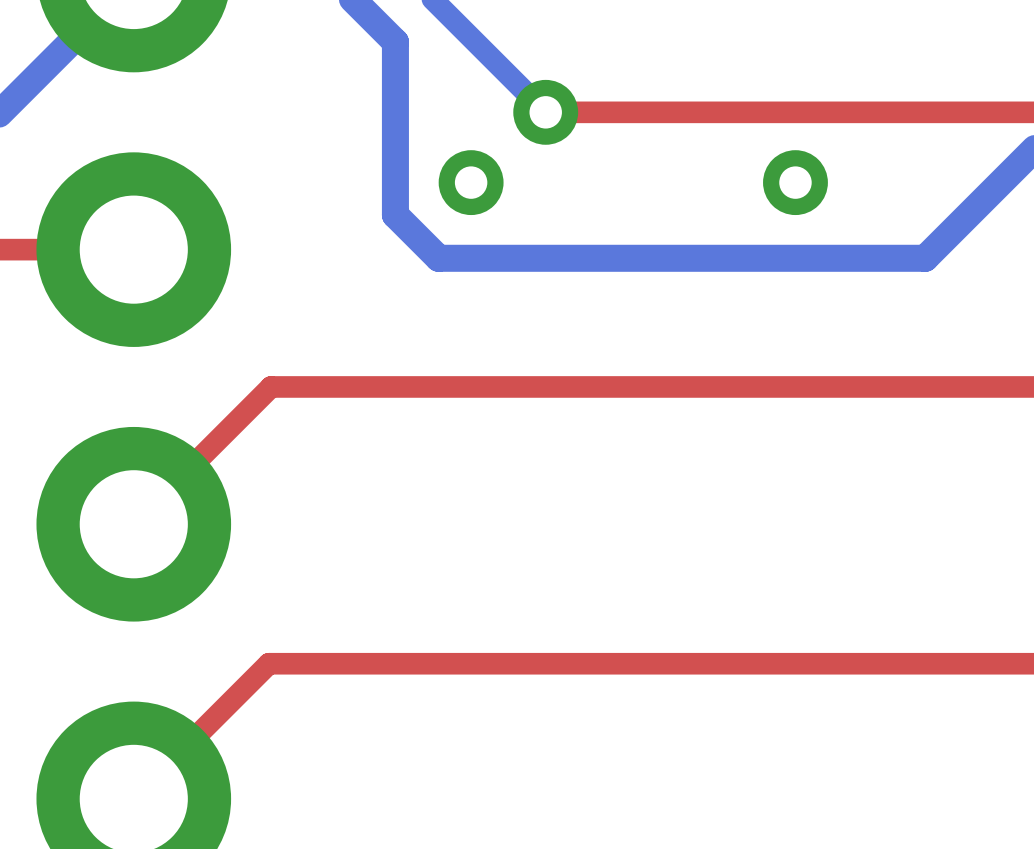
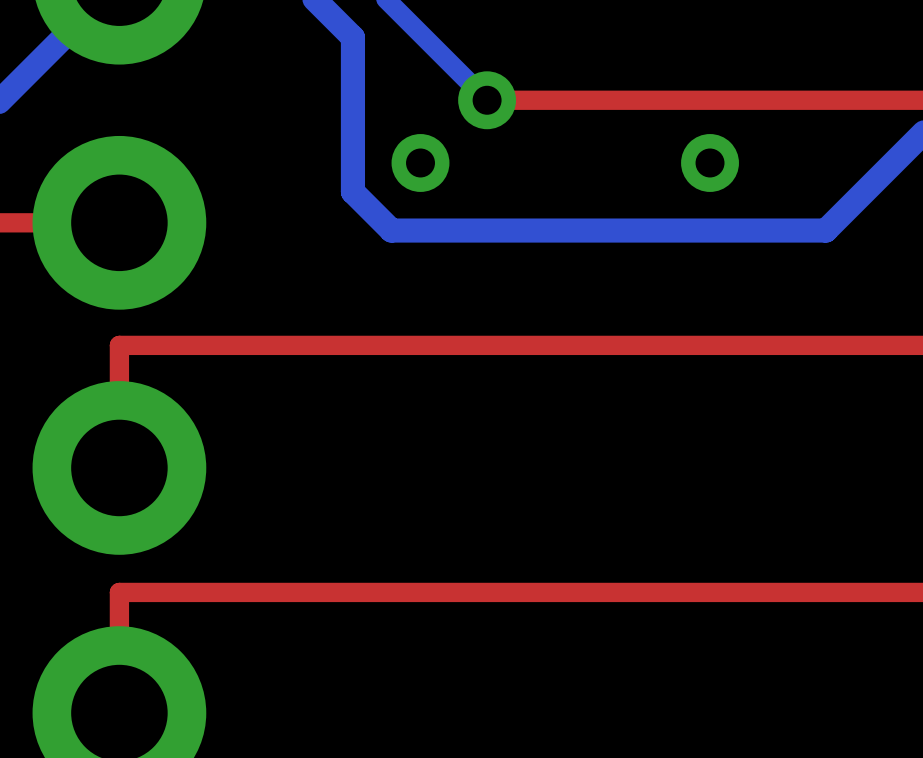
top track: (271, 386) (133, 524) -> (241, 345) (119, 345) (119, 467)
top track: (268, 663) (133, 798) -> (240, 592) (119, 592) (119, 713)

